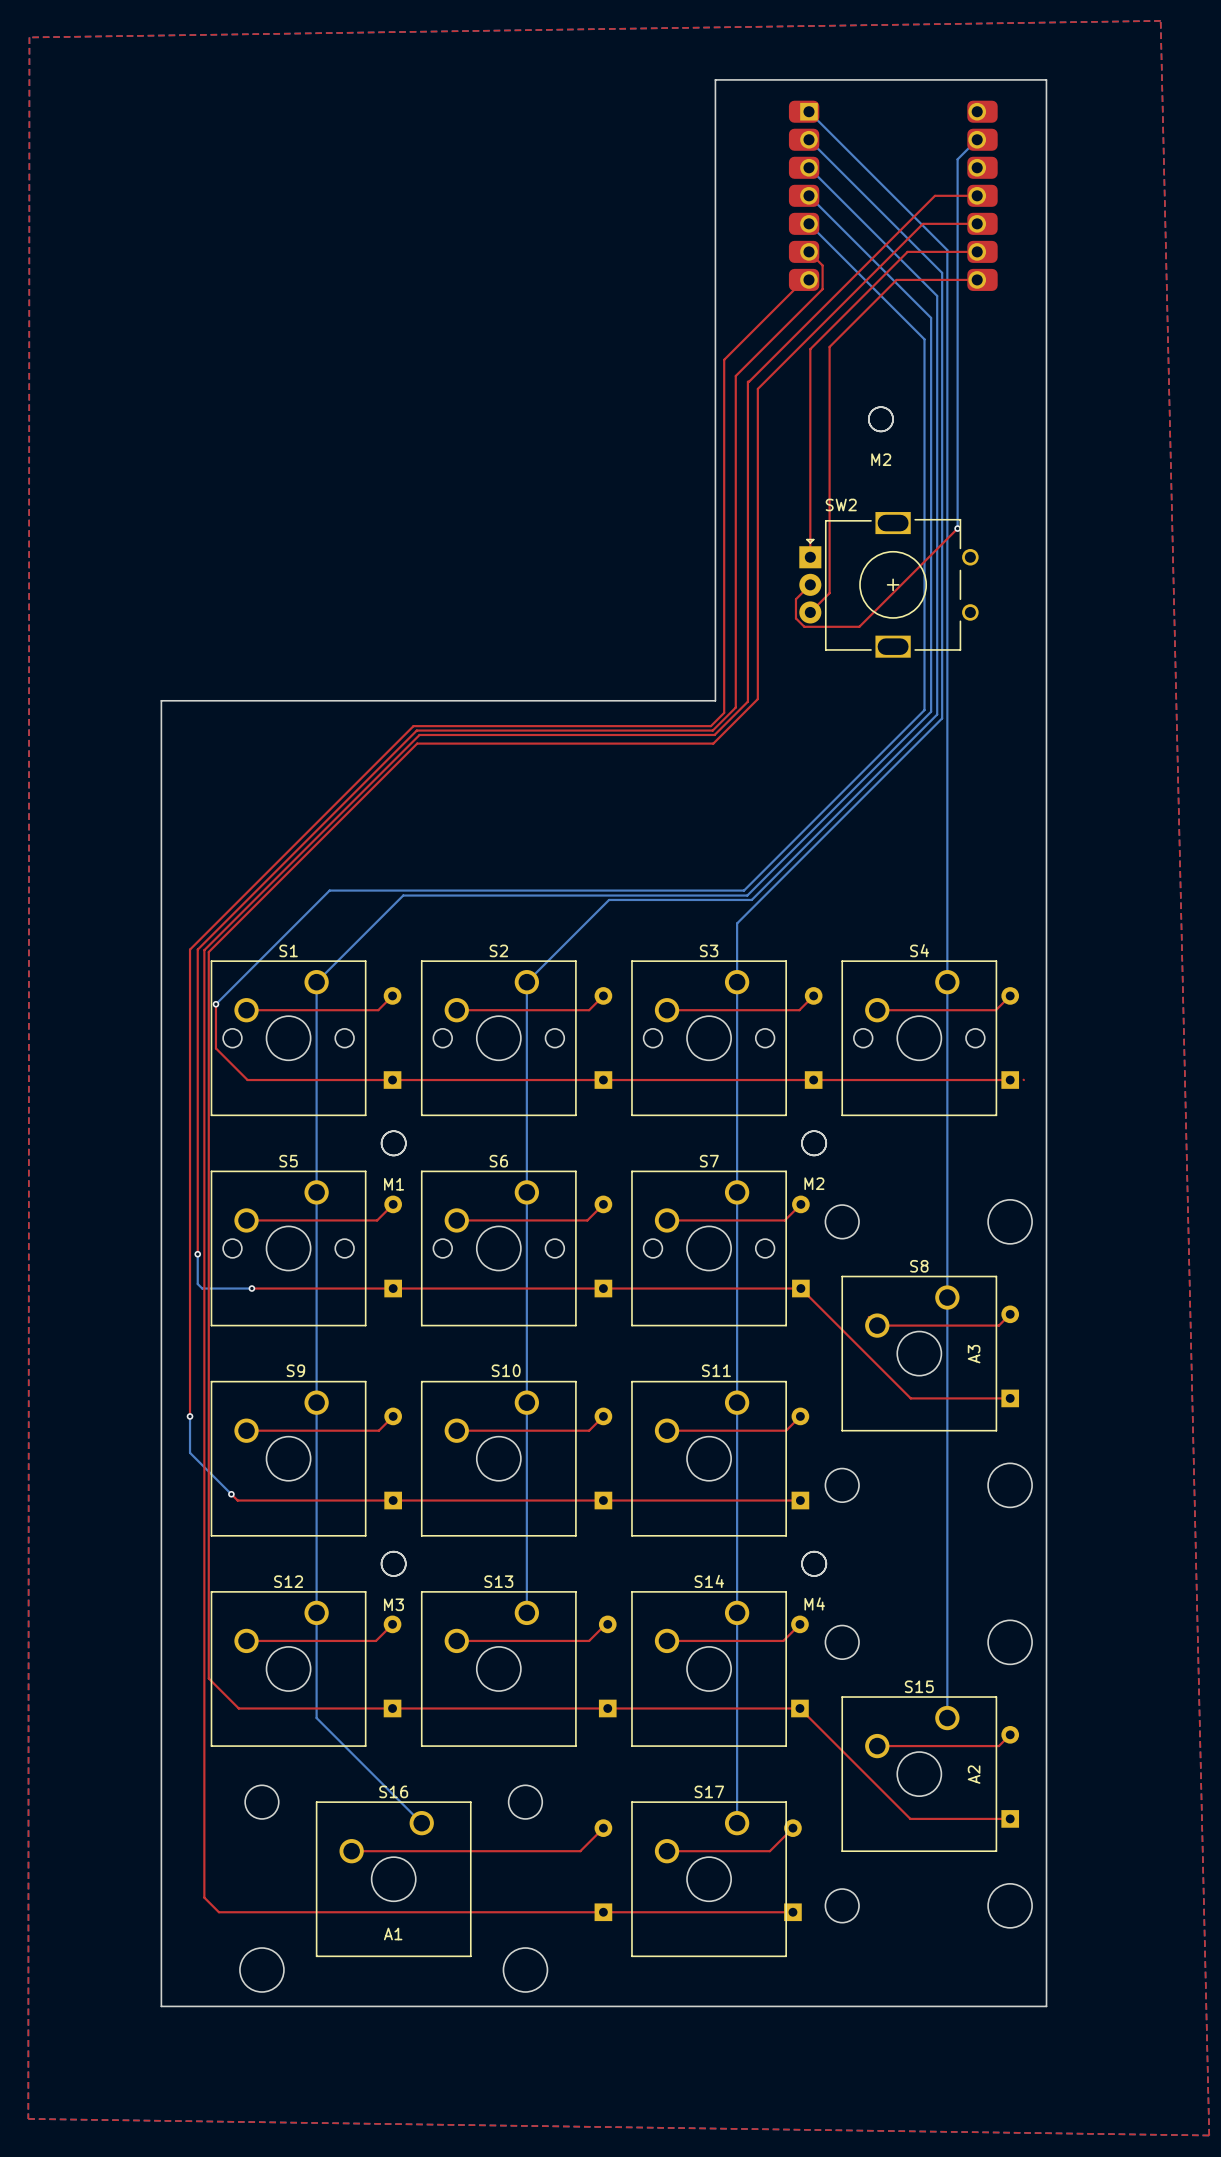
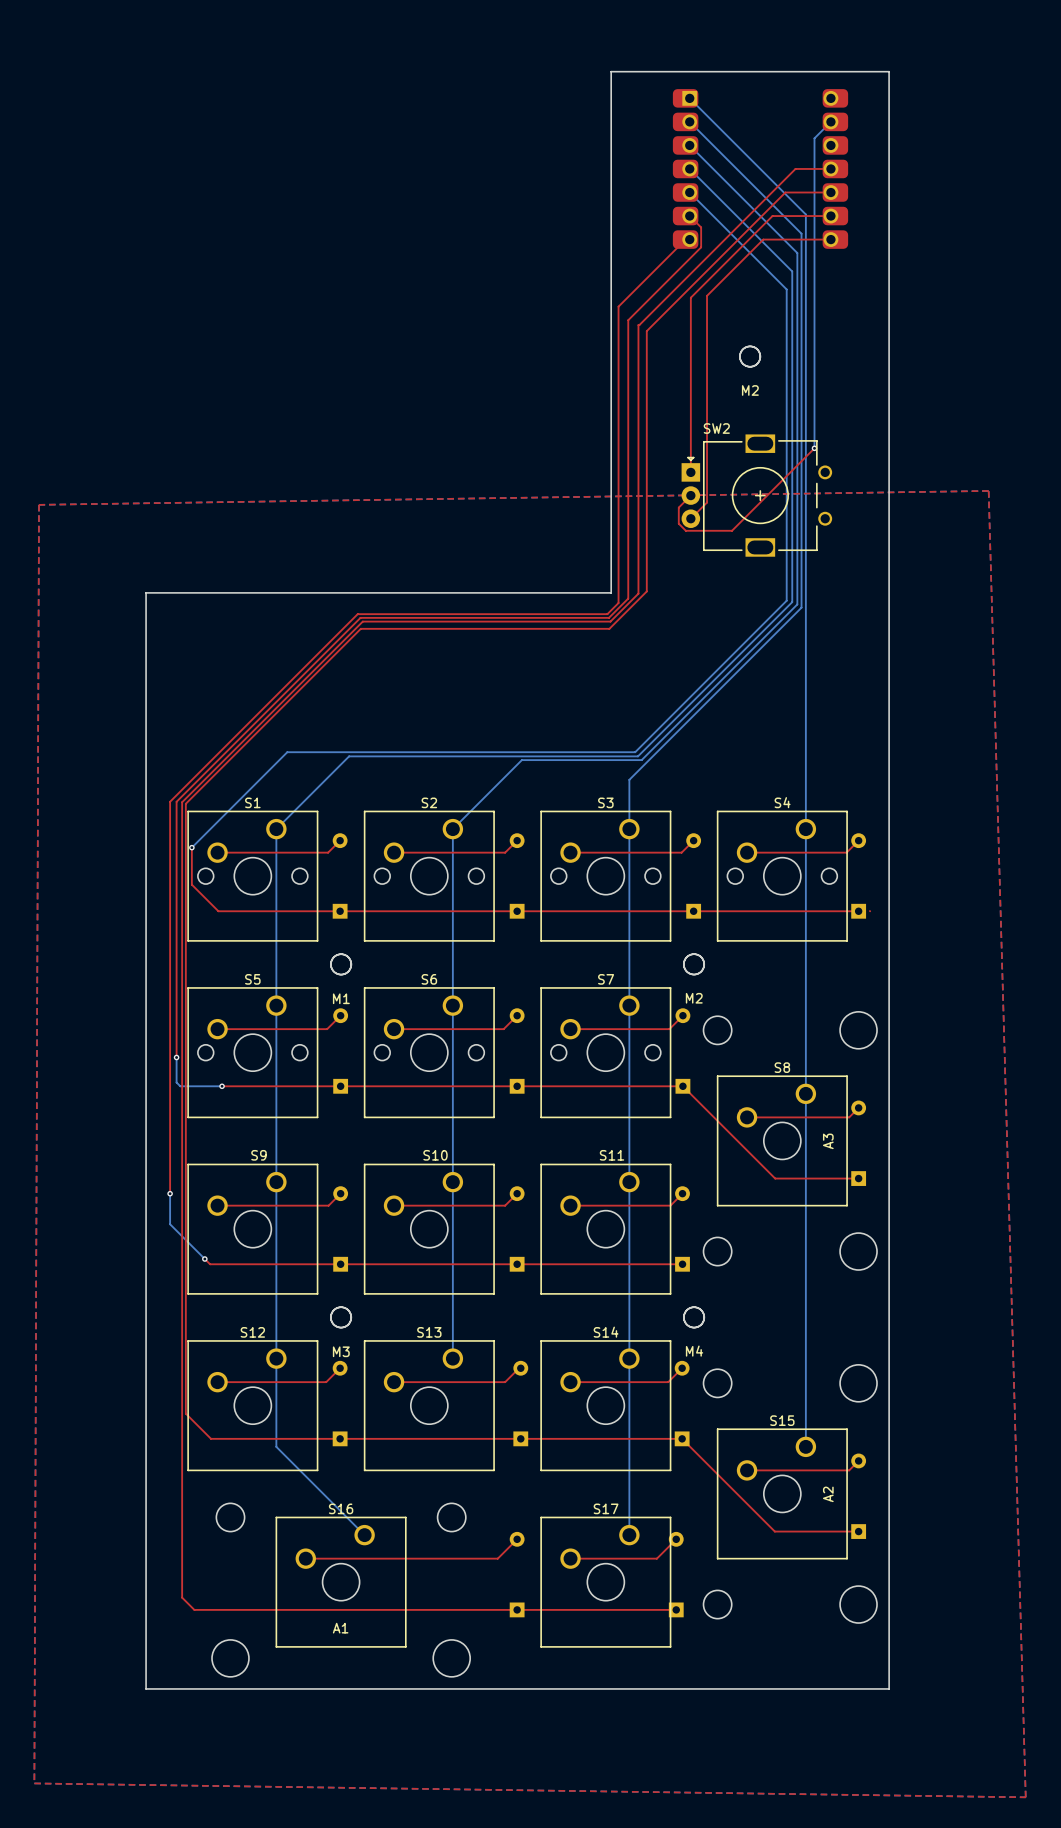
top zone outline: (28, 2118) (29, 37) (1160, 20) (1209, 2135) -> (34, 1783) (39, 504) (988, 490) (1025, 1797)

